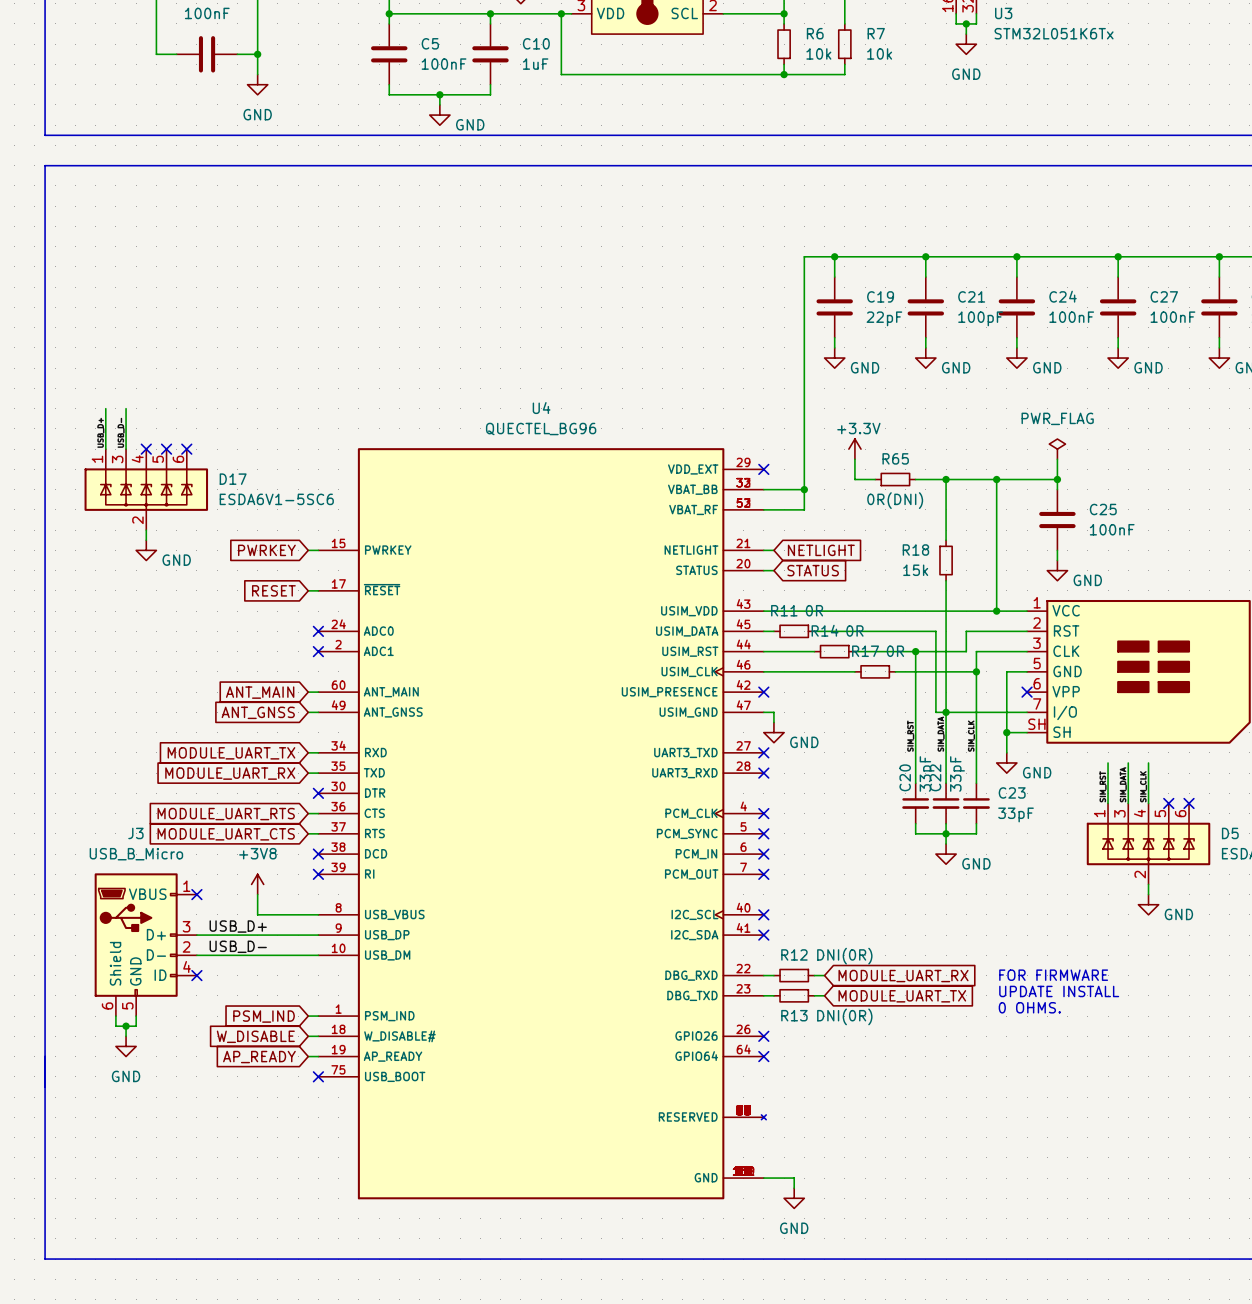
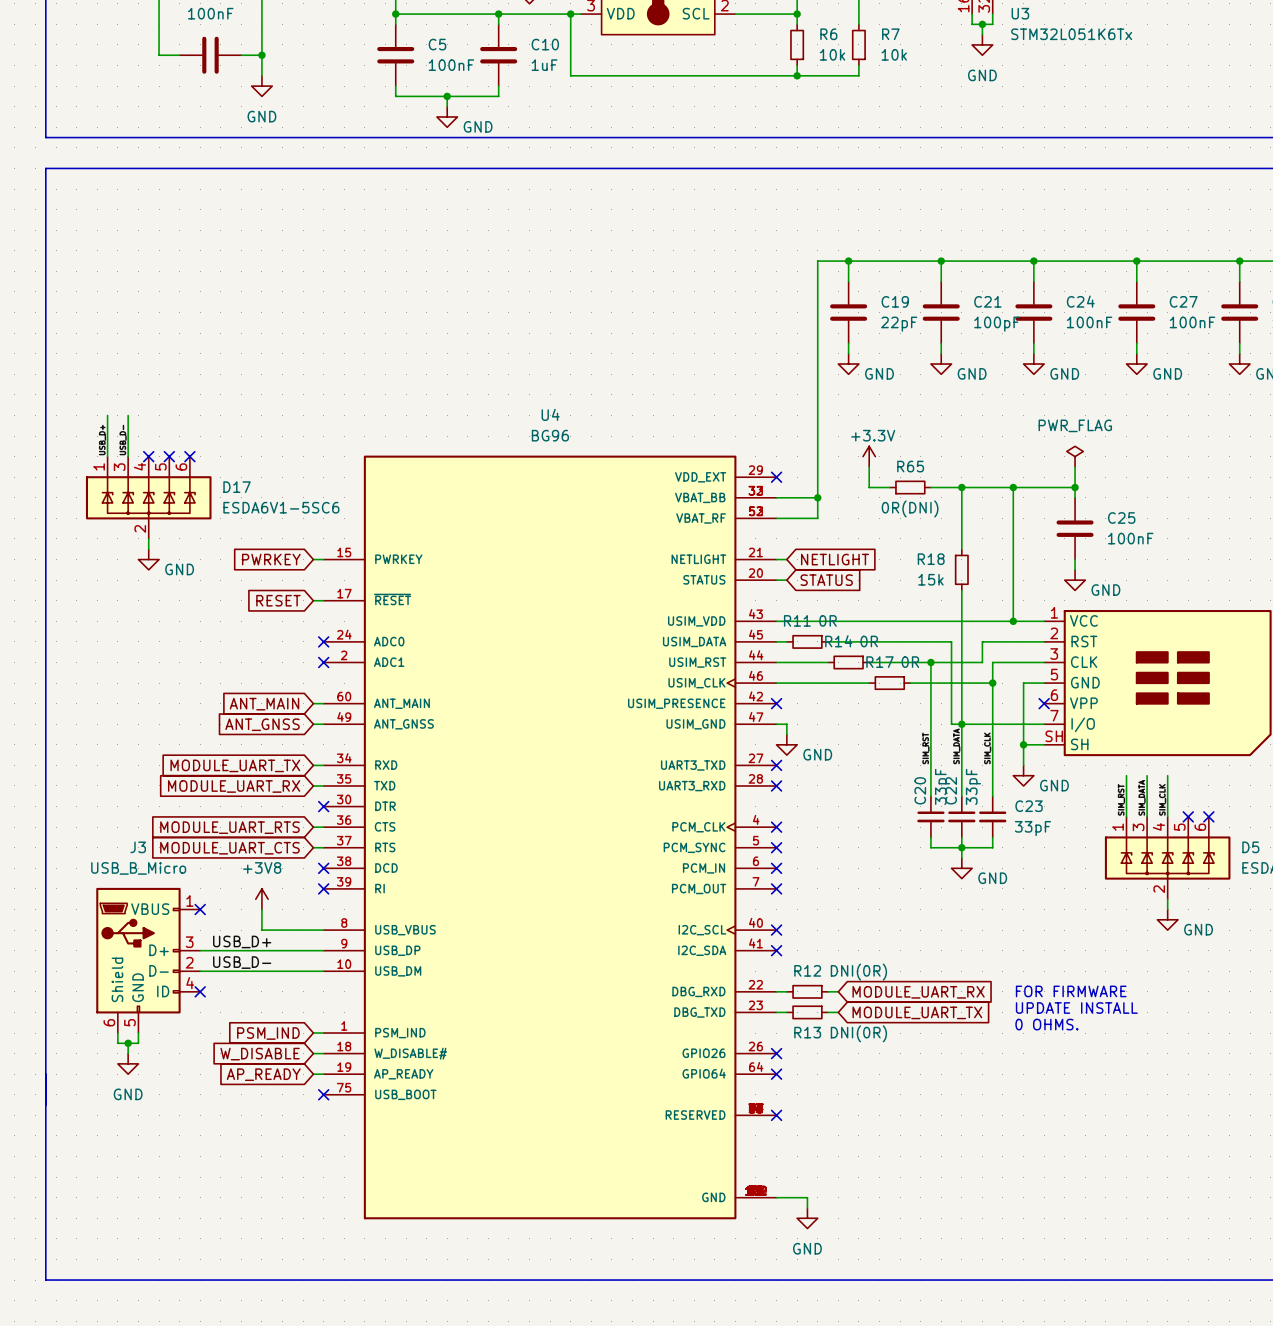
U4 value: QUECTEL_BG96 (541, 429) -> BG96 (550, 435)
U4 symbol: [318, 448, 767, 1200] -> [323, 455, 777, 1220]
no-connect mark: none -> (776, 1115)

